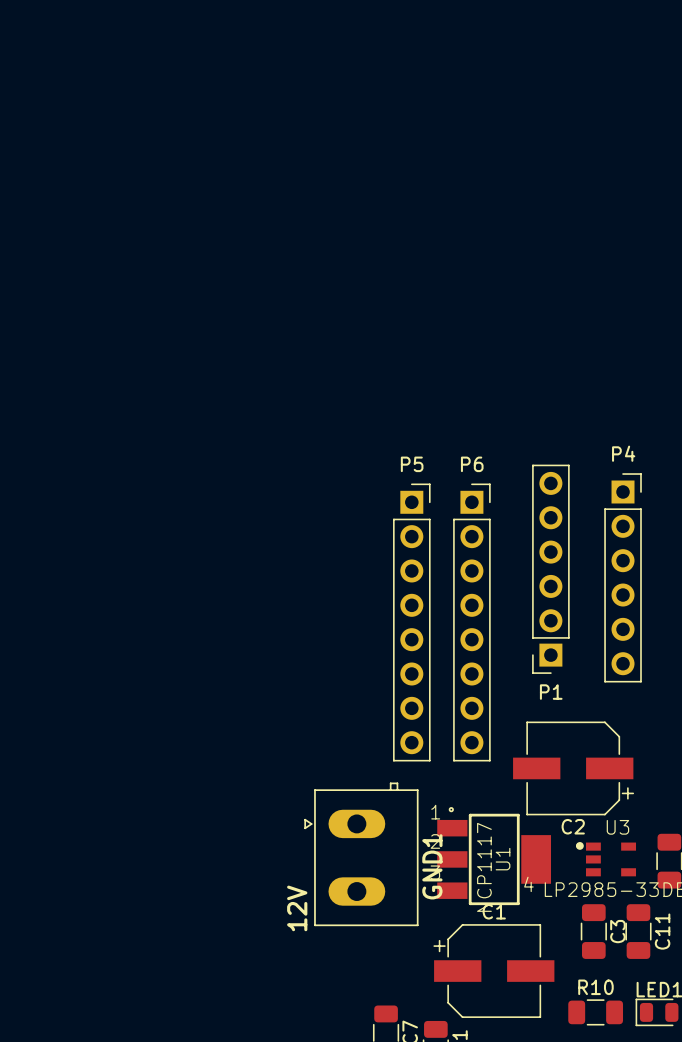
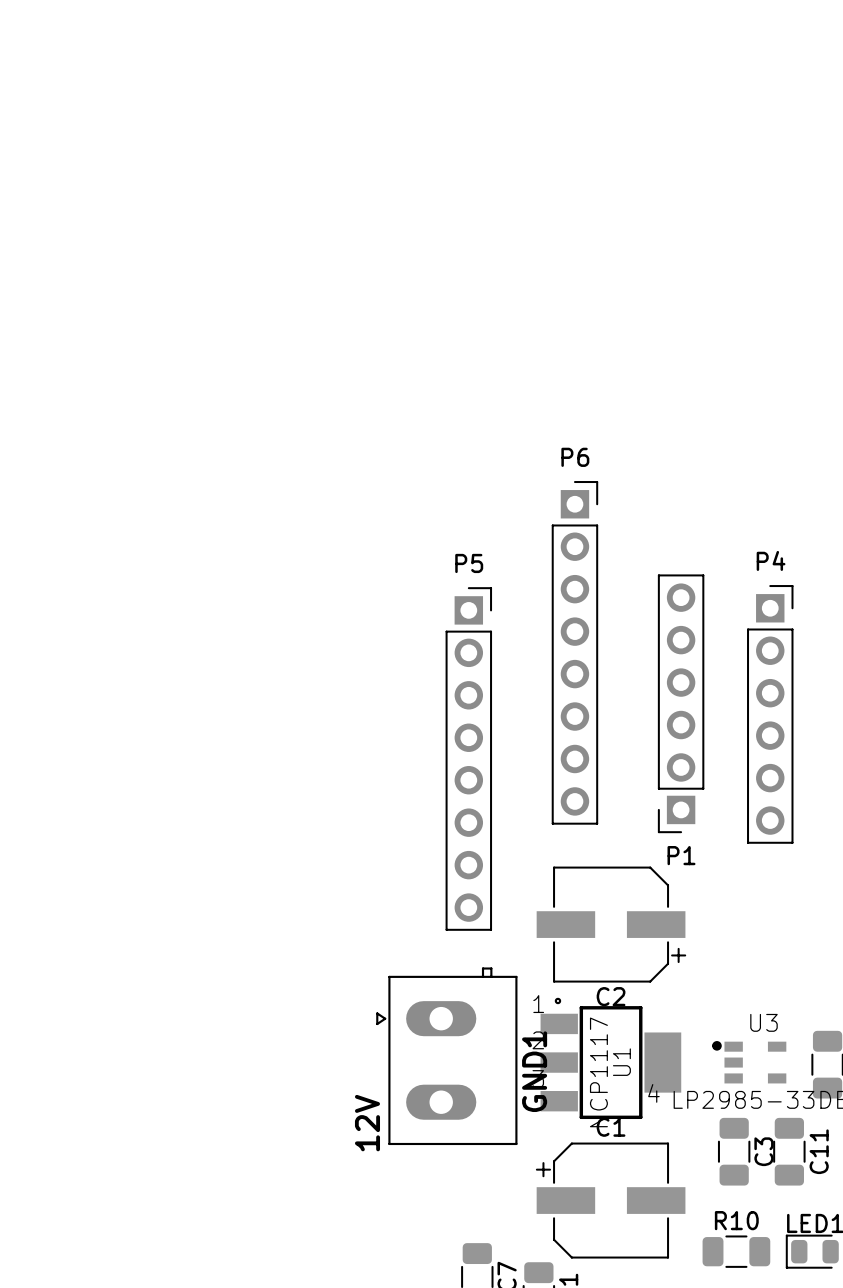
P5 position: (411, 622) -> (468, 758)
P6 position: (471, 622) -> (574, 652)
C2 position: (573, 768) -> (611, 924)

